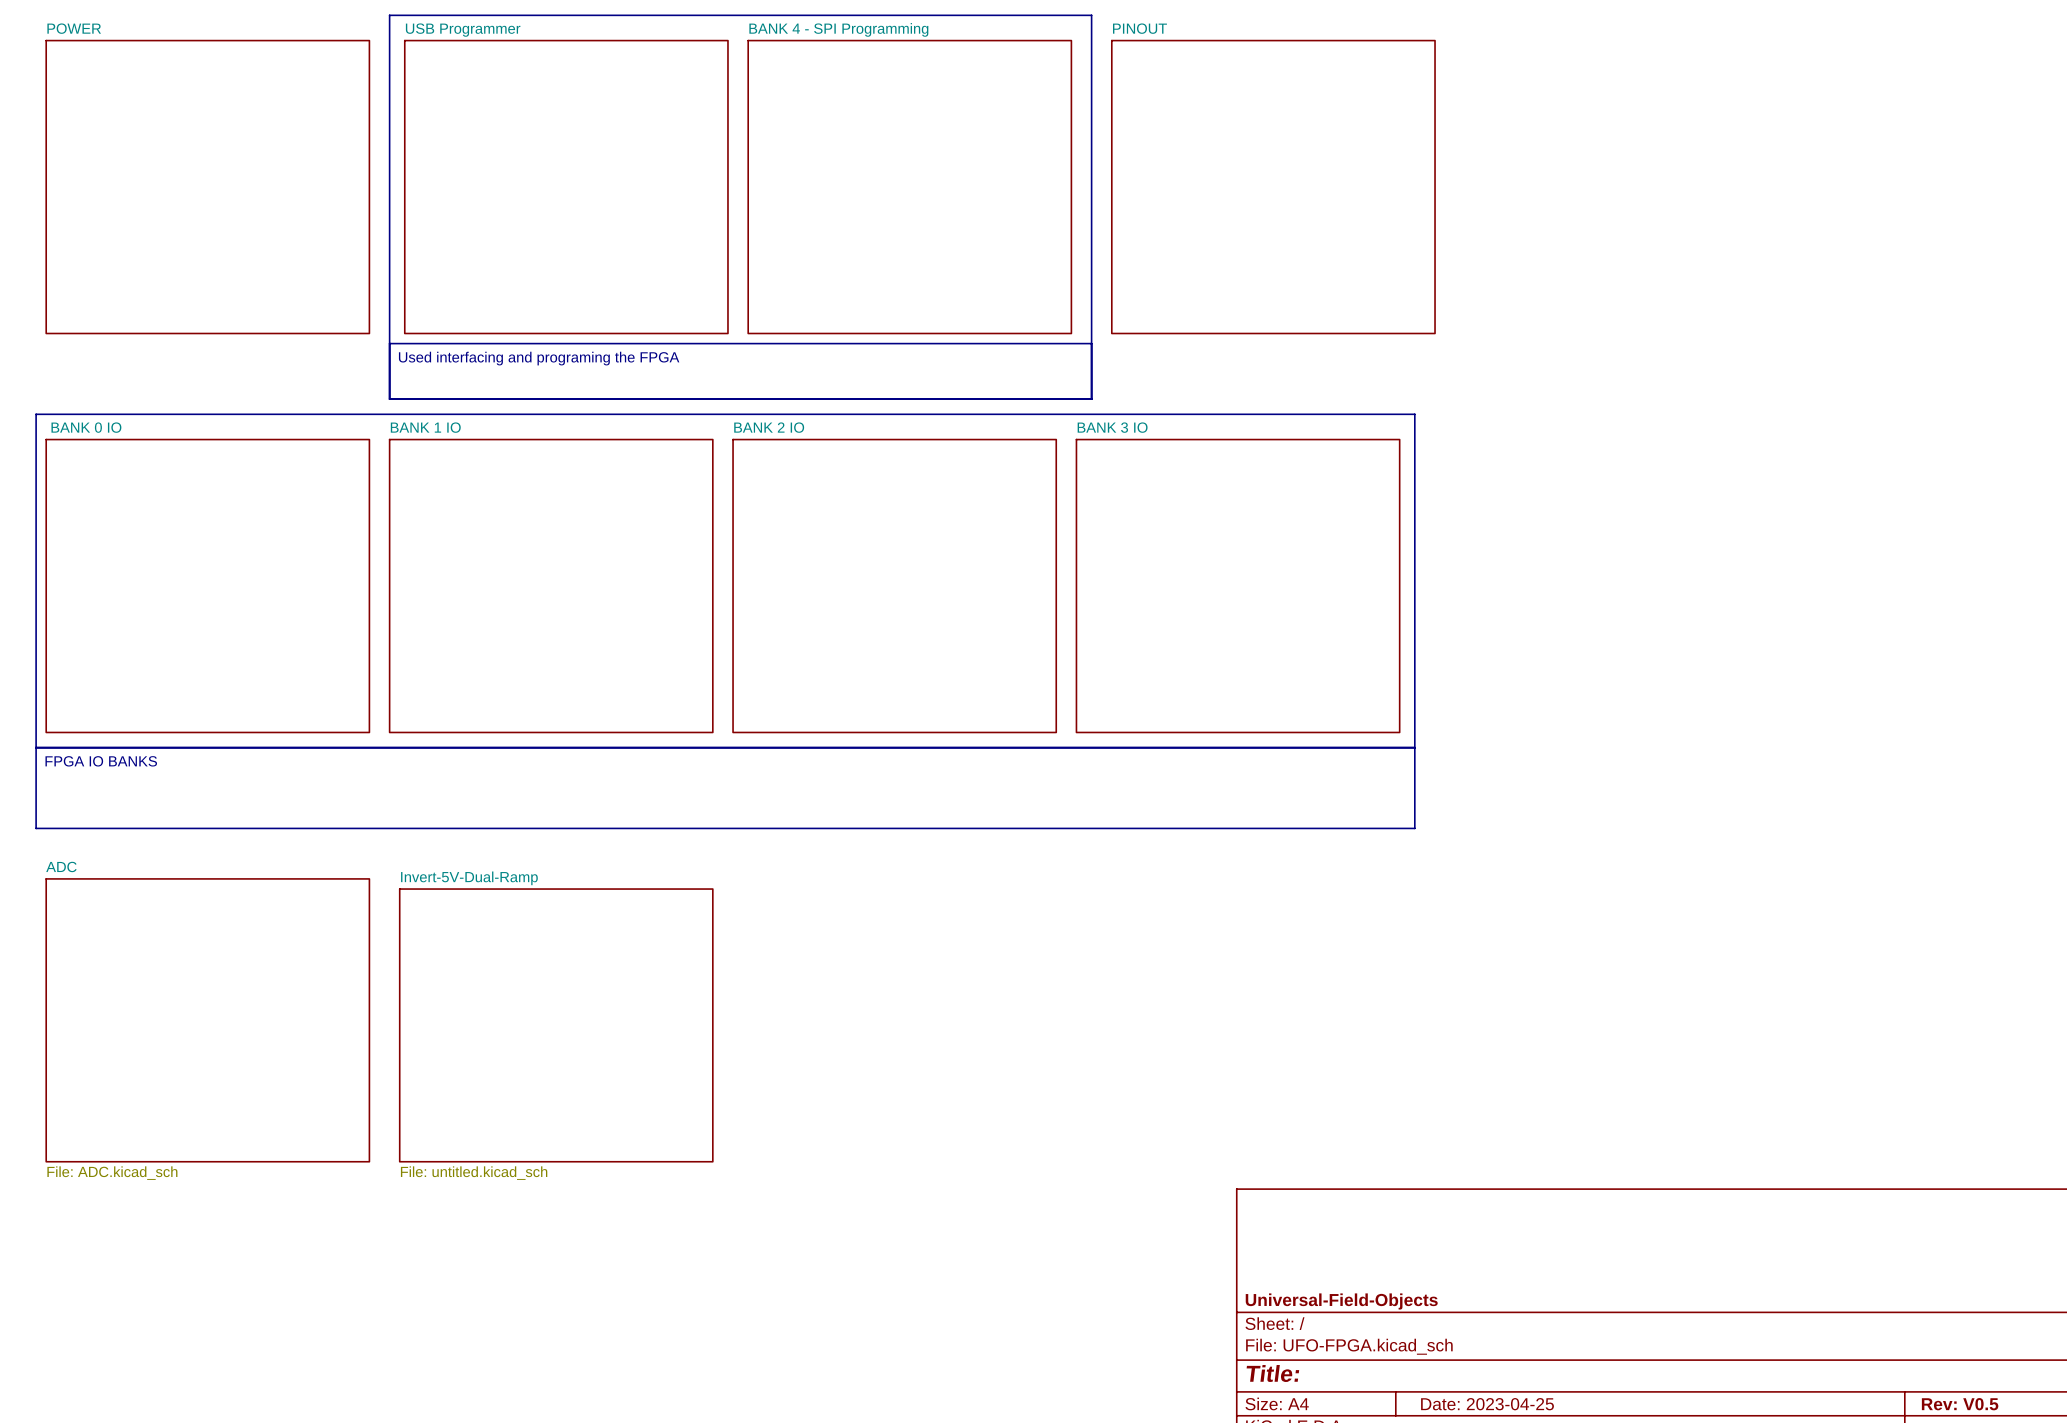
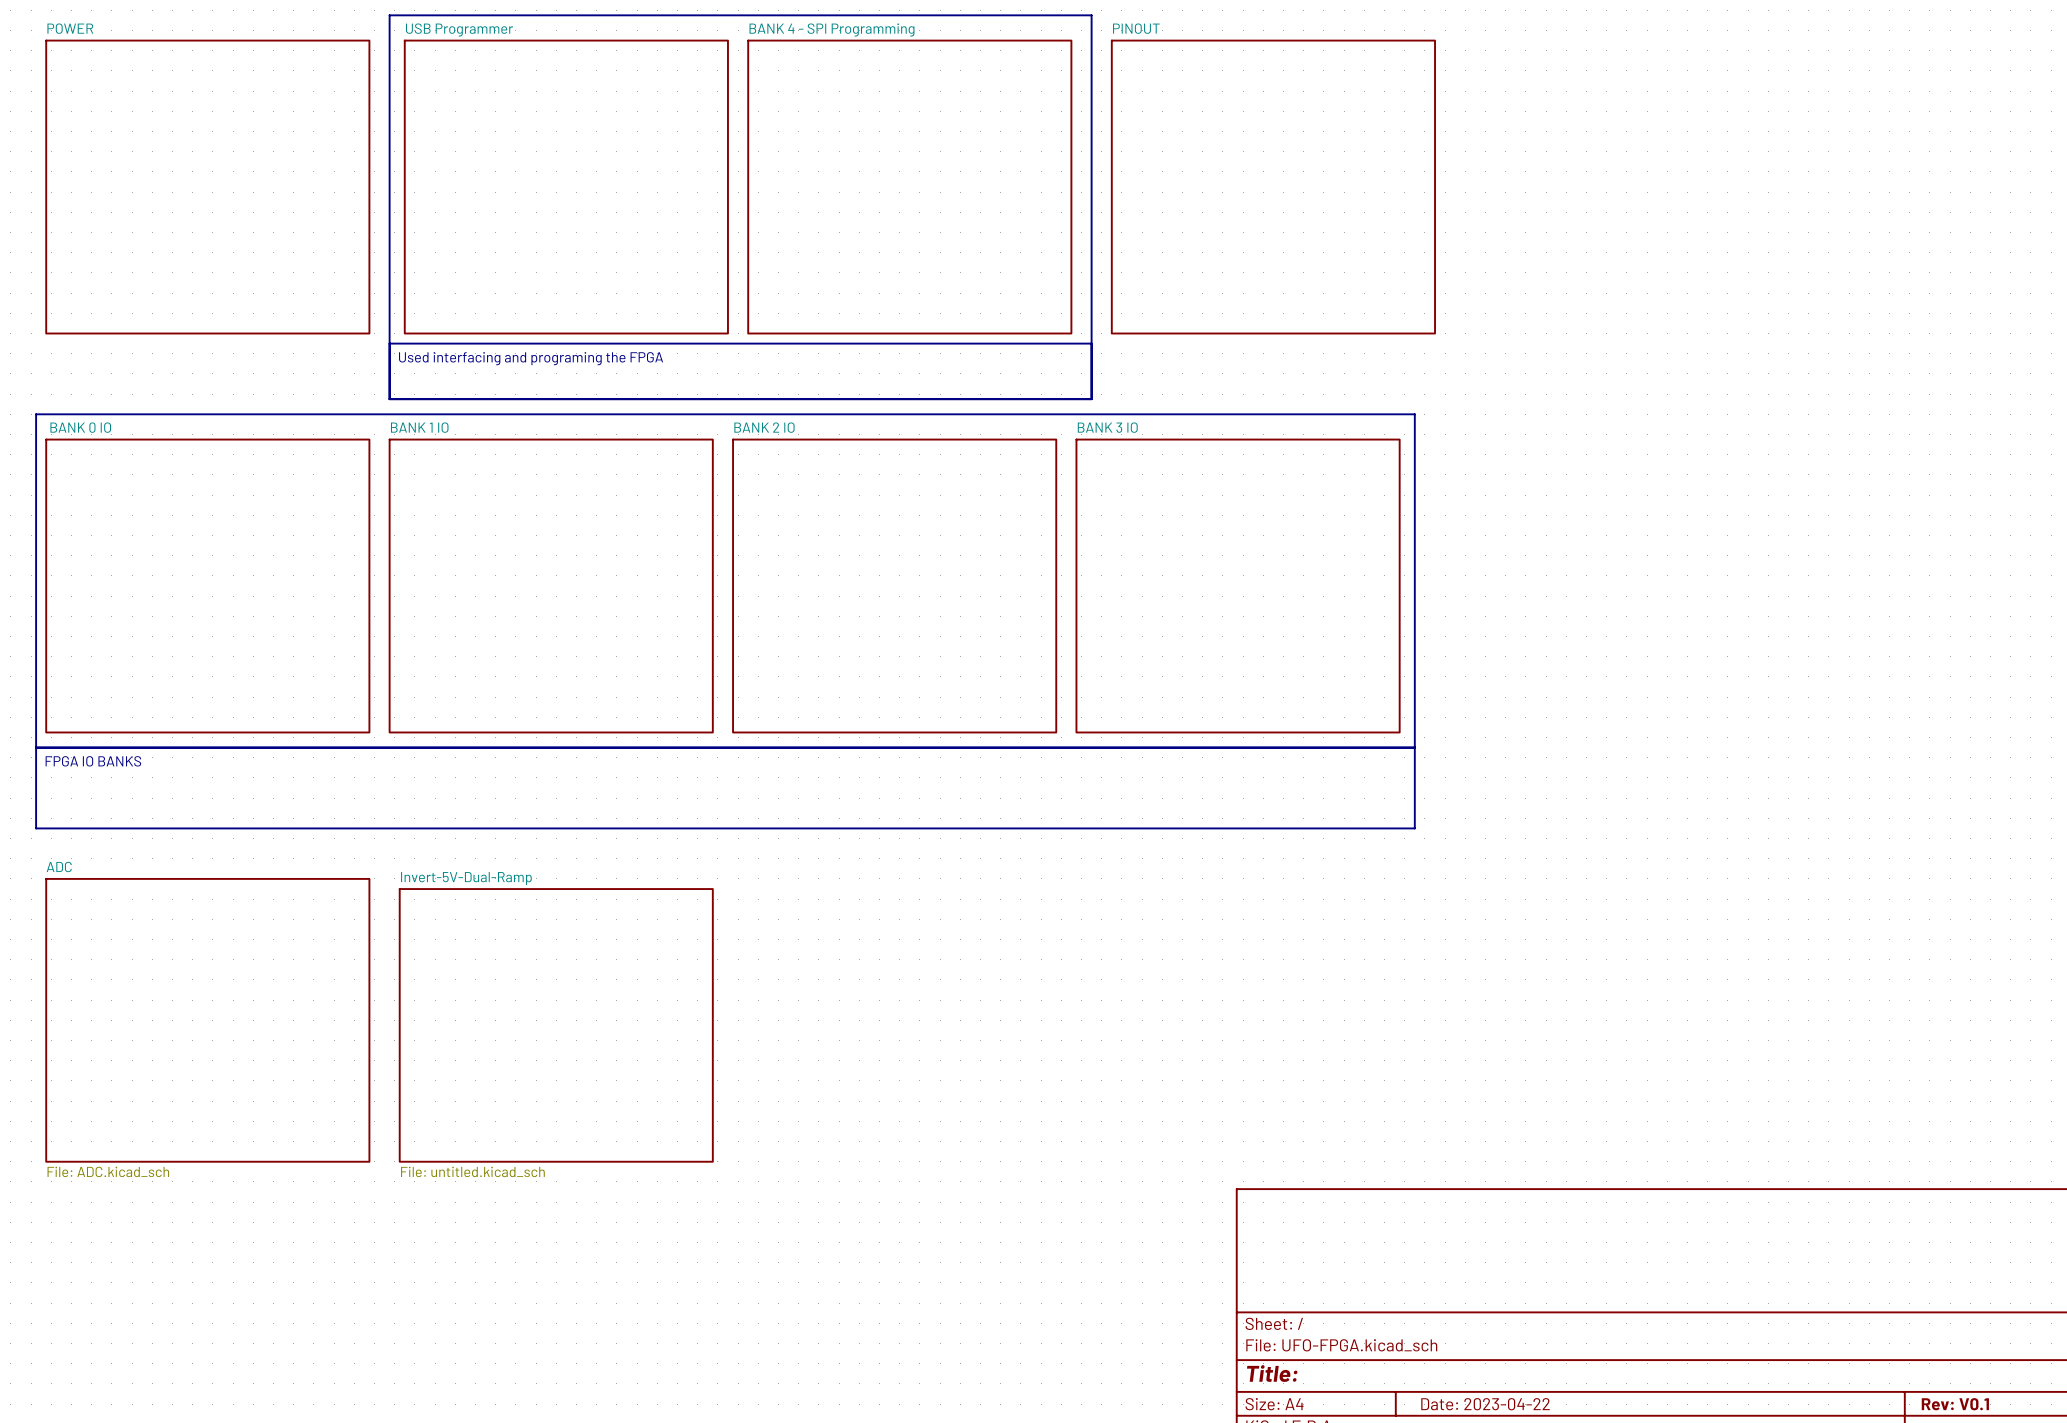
title block: Universal-Field-Objects (1341, 1301) -> none
title block: Date: 2023-04-25 (1487, 1404) -> Date: 2023-04-22 (1485, 1404)
title block: Rev: V0.5 (1960, 1404) -> Rev: V0.1 (1955, 1404)

